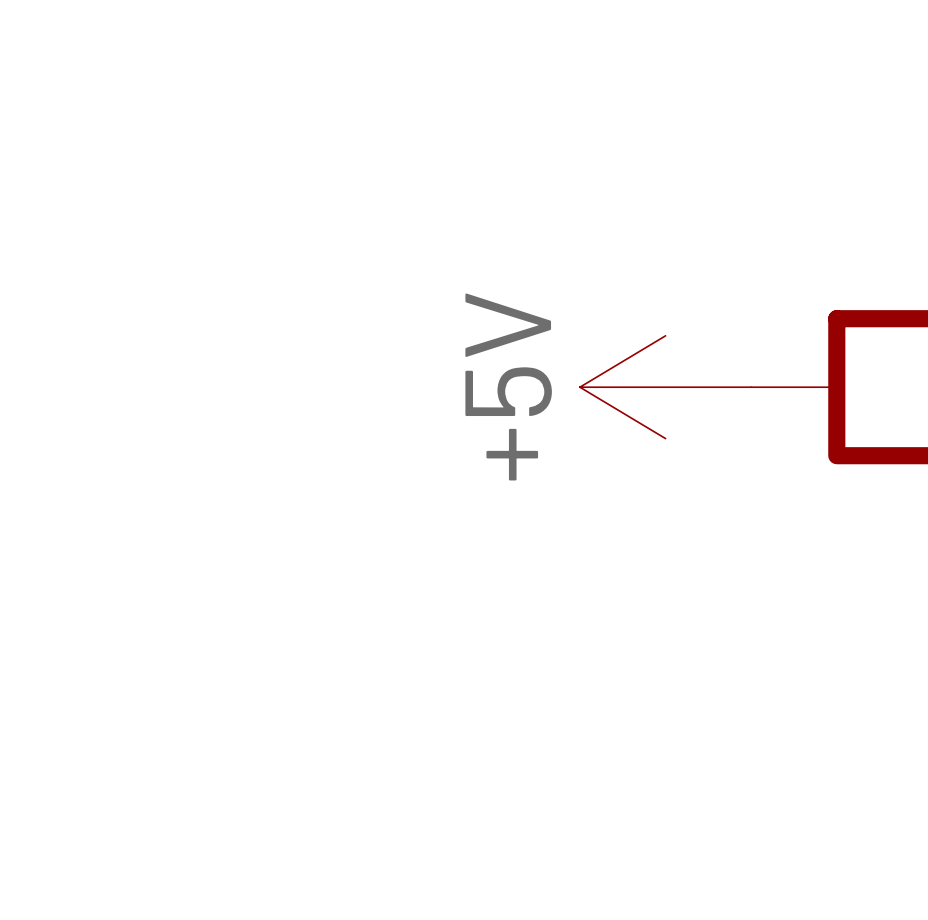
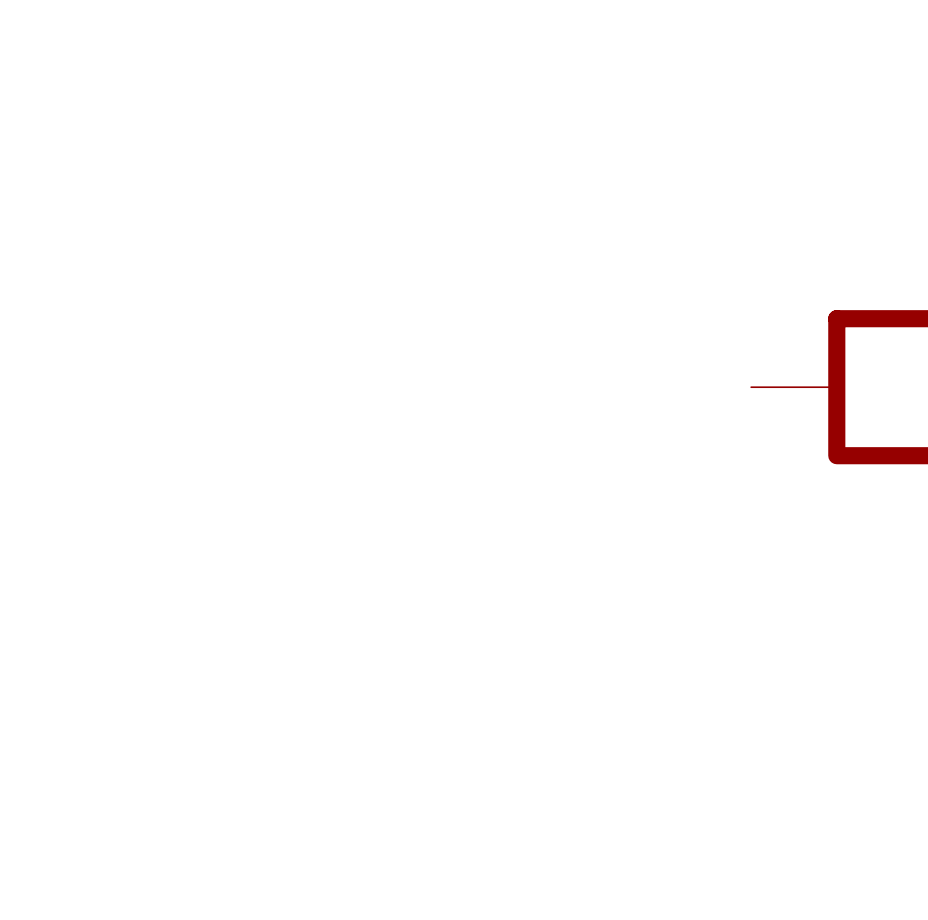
power symbol: +5V (665, 387) -> none

